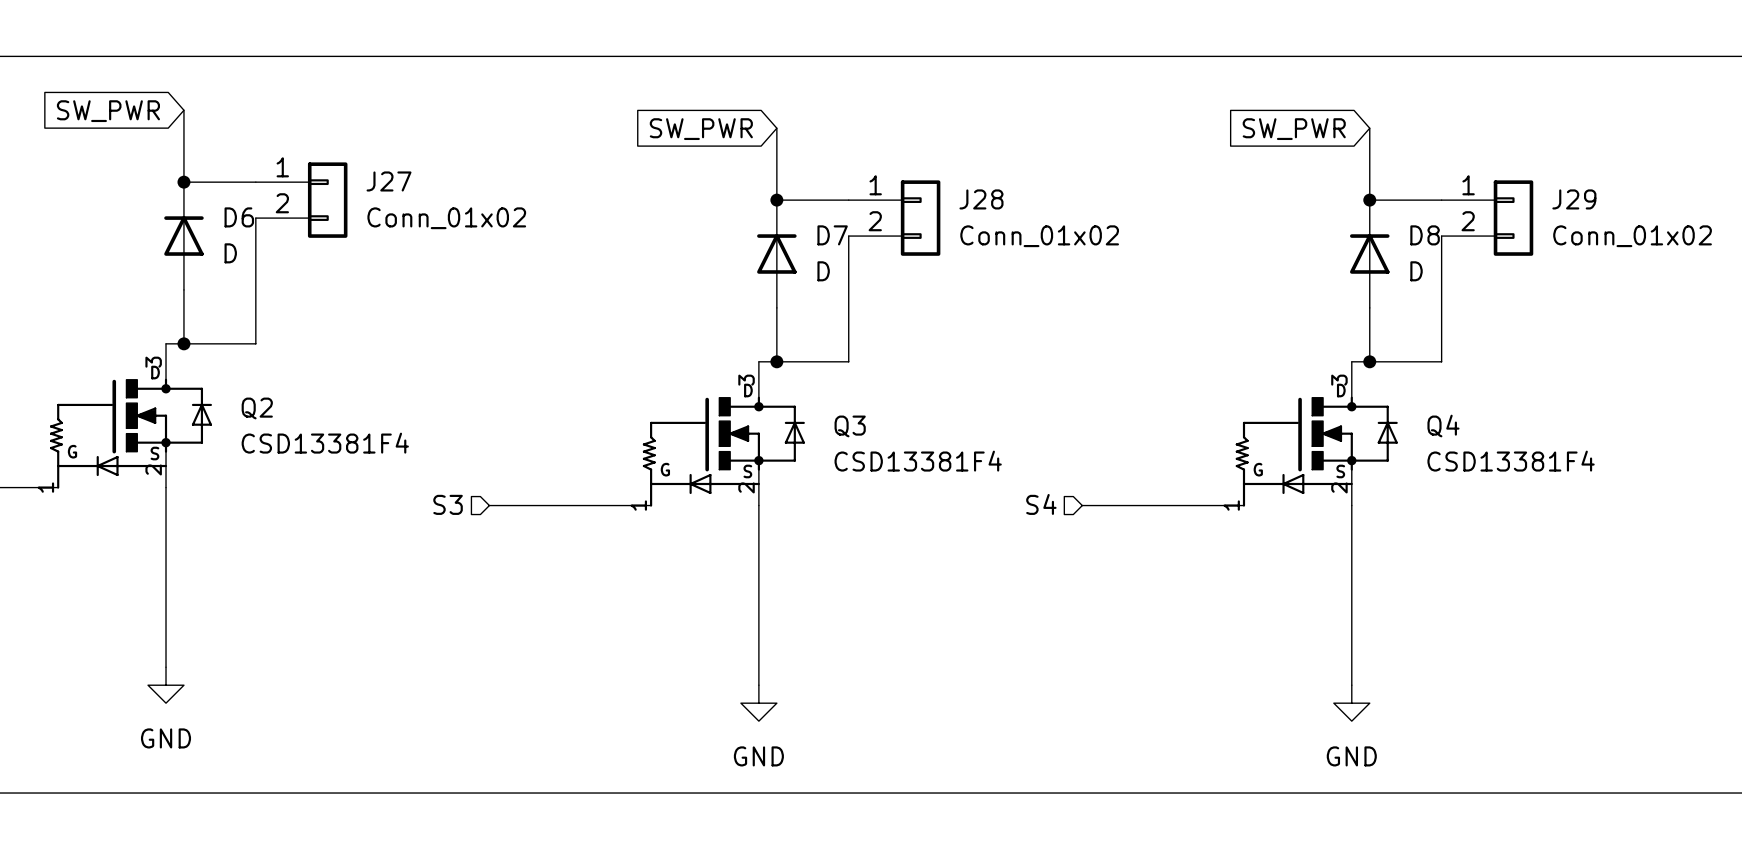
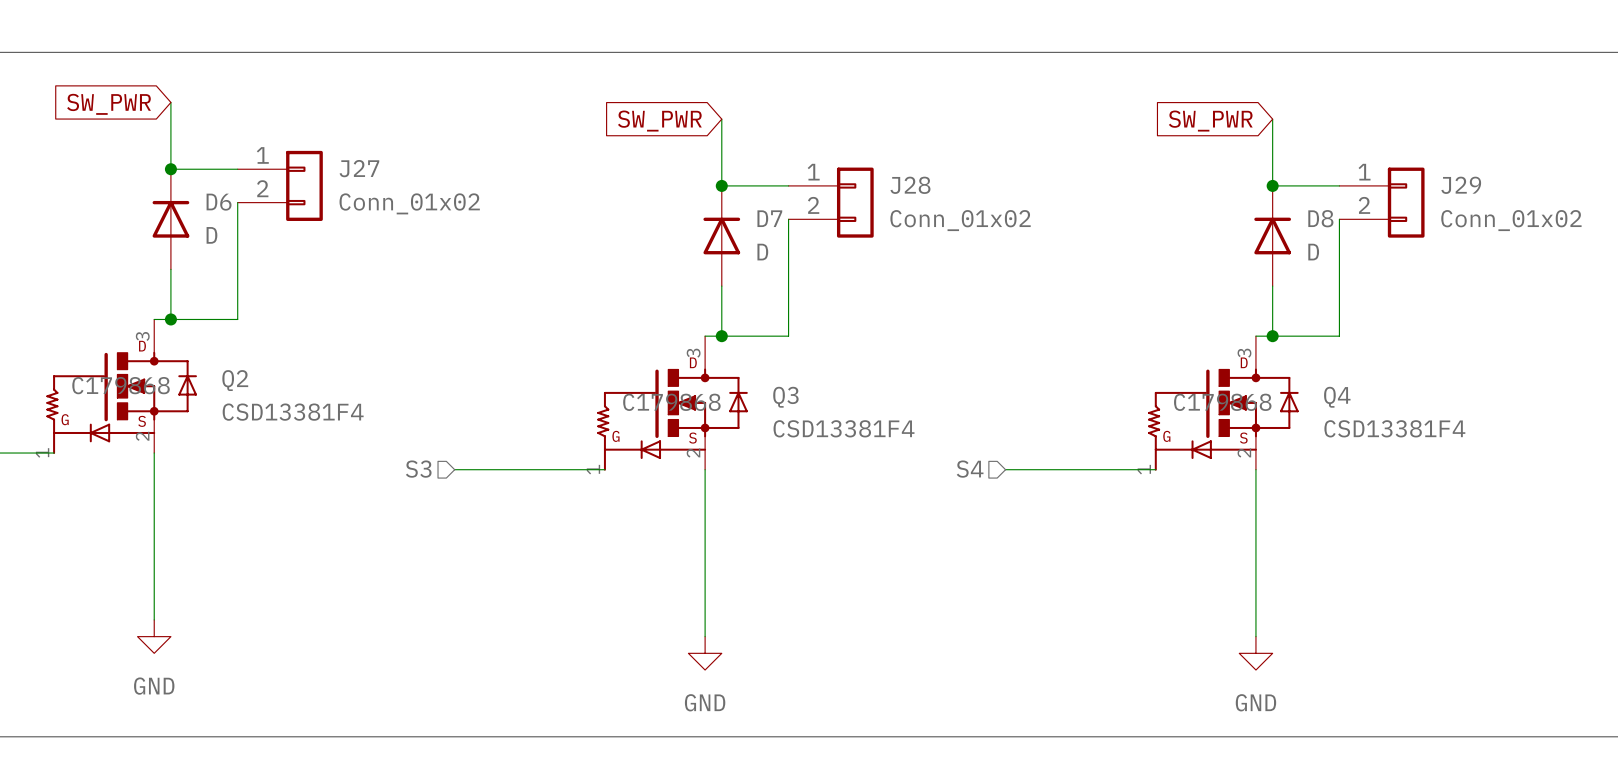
Q2 text: none -> C179868 (121, 385)
Q3 text: none -> C179868 (671, 402)
Q4 text: none -> C179868 (1222, 402)

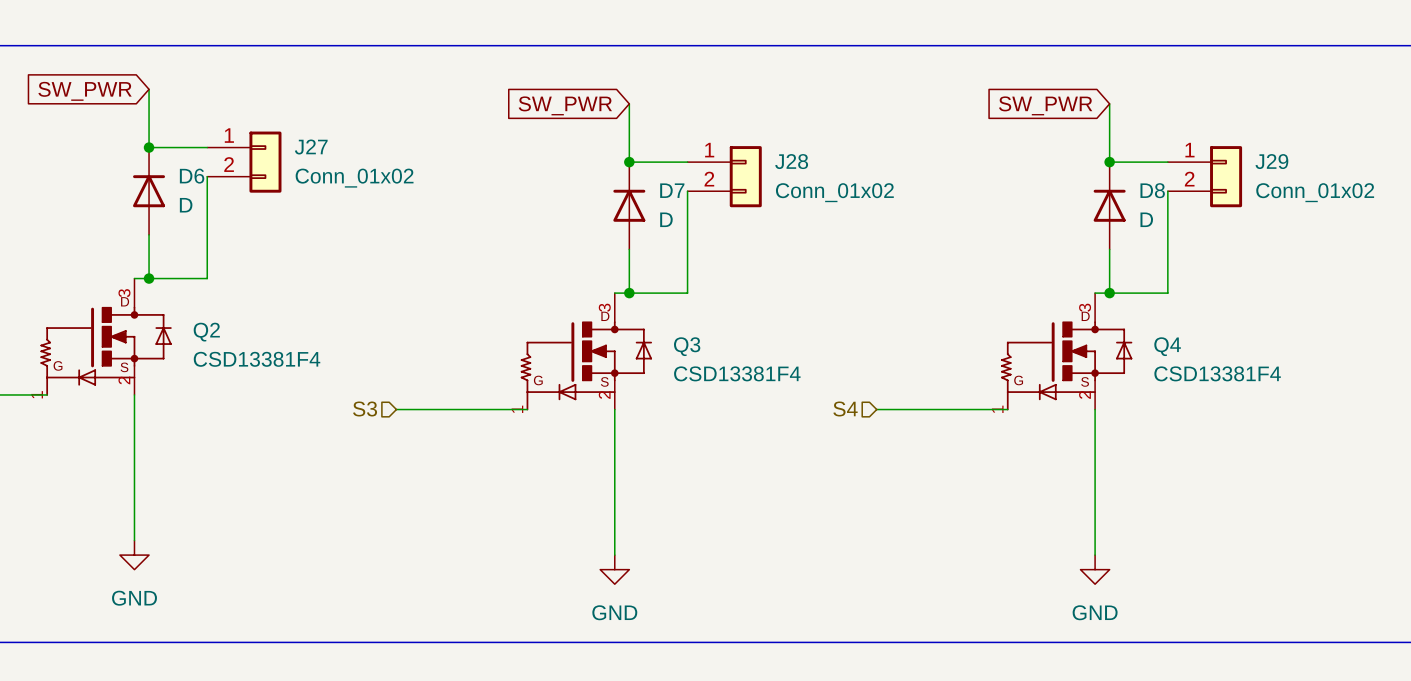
Q2 text: C179868 (121, 385) -> none
Q3 text: C179868 (671, 402) -> none
Q4 text: C179868 (1222, 402) -> none

